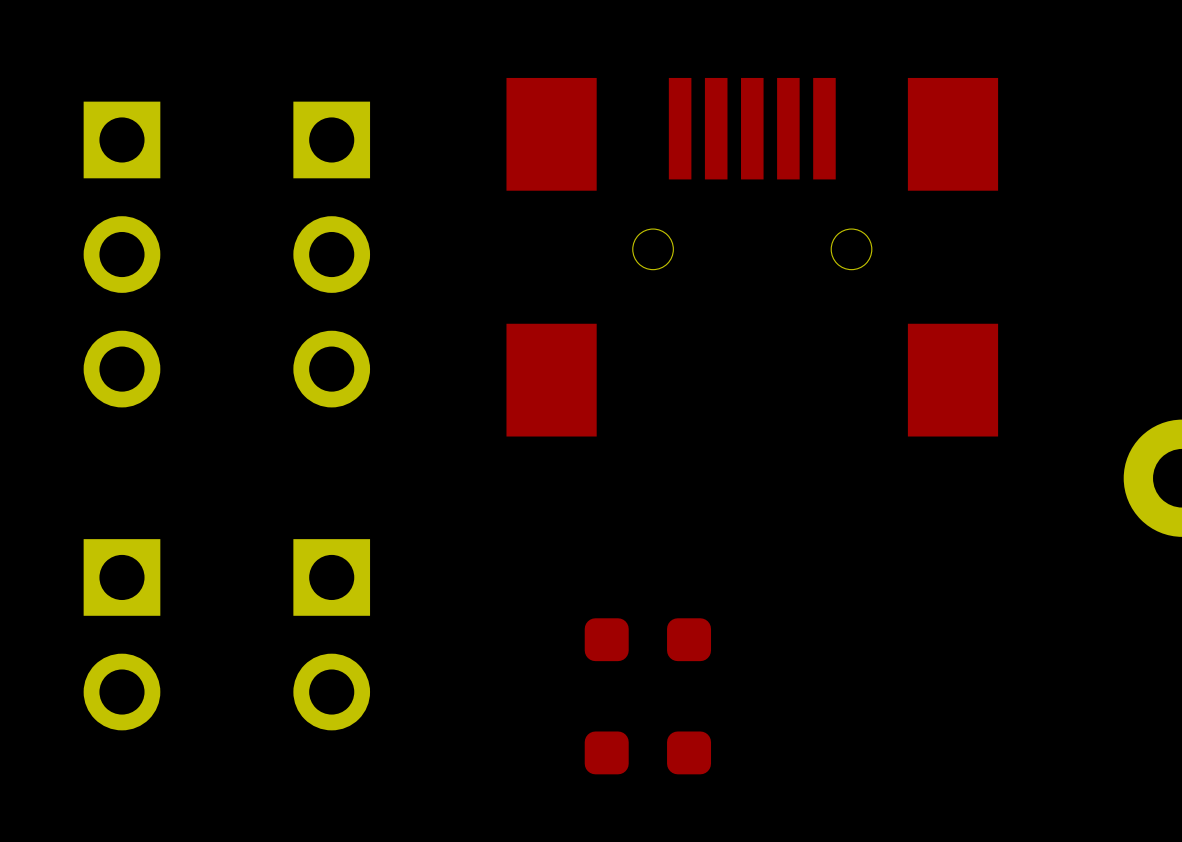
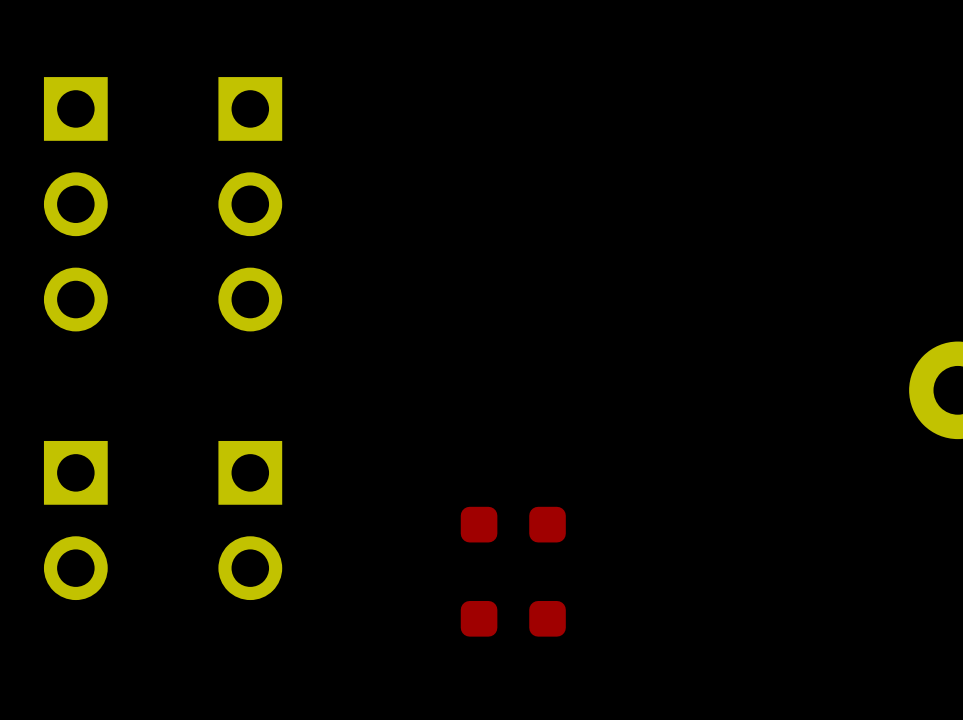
part: (752, 257) -> none

